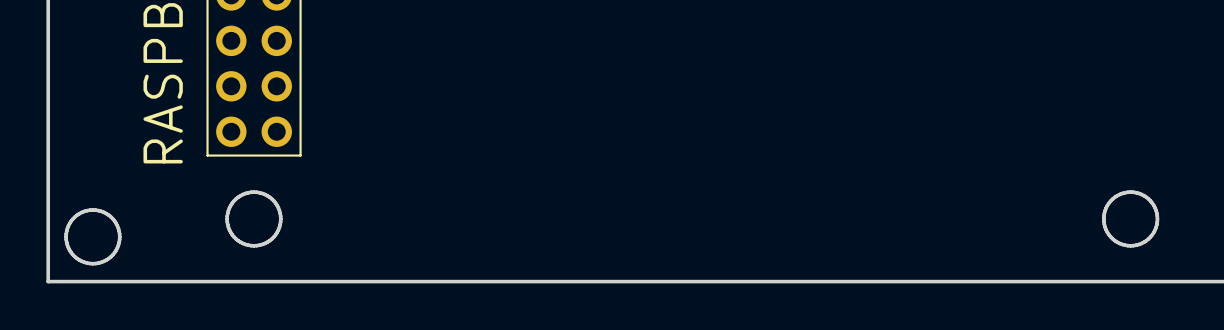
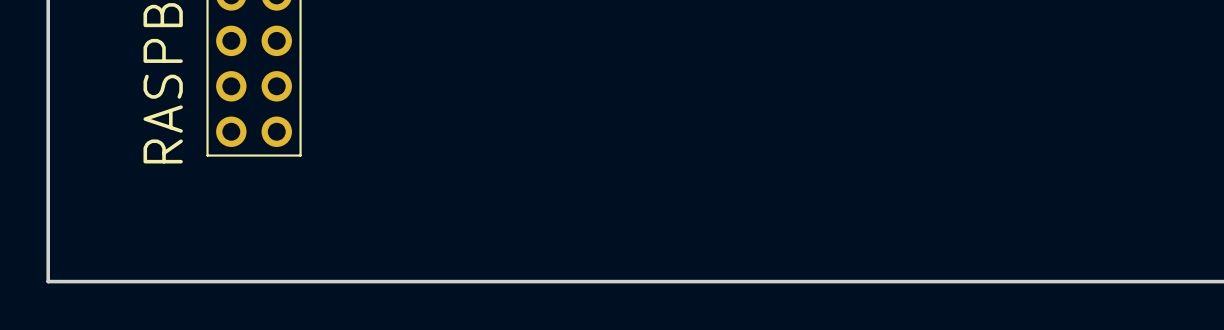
board edge: (253, 192) (264, 194) (273, 201) (279, 210) (280, 218) (279, 227) (273, 236) (264, 243) (253, 245) (243, 243) (234, 236) (228, 227) (227, 218) (228, 210) (234, 201) (243, 194) (253, 192) -> none
board edge: (1130, 192) (1138, 193) (1148, 199) (1155, 208) (1157, 218) (1156, 227) (1150, 236) (1141, 243) (1130, 245) (1122, 244) (1112, 238) (1106, 229) (1103, 218) (1105, 210) (1110, 201) (1119, 194) (1130, 192) -> none
board edge: (92, 210) (103, 212) (112, 218) (118, 228) (119, 236) (118, 245) (112, 254) (103, 261) (92, 263) (82, 261) (72, 254) (67, 245) (66, 236) (67, 228) (72, 218) (82, 212) (92, 210) -> none

